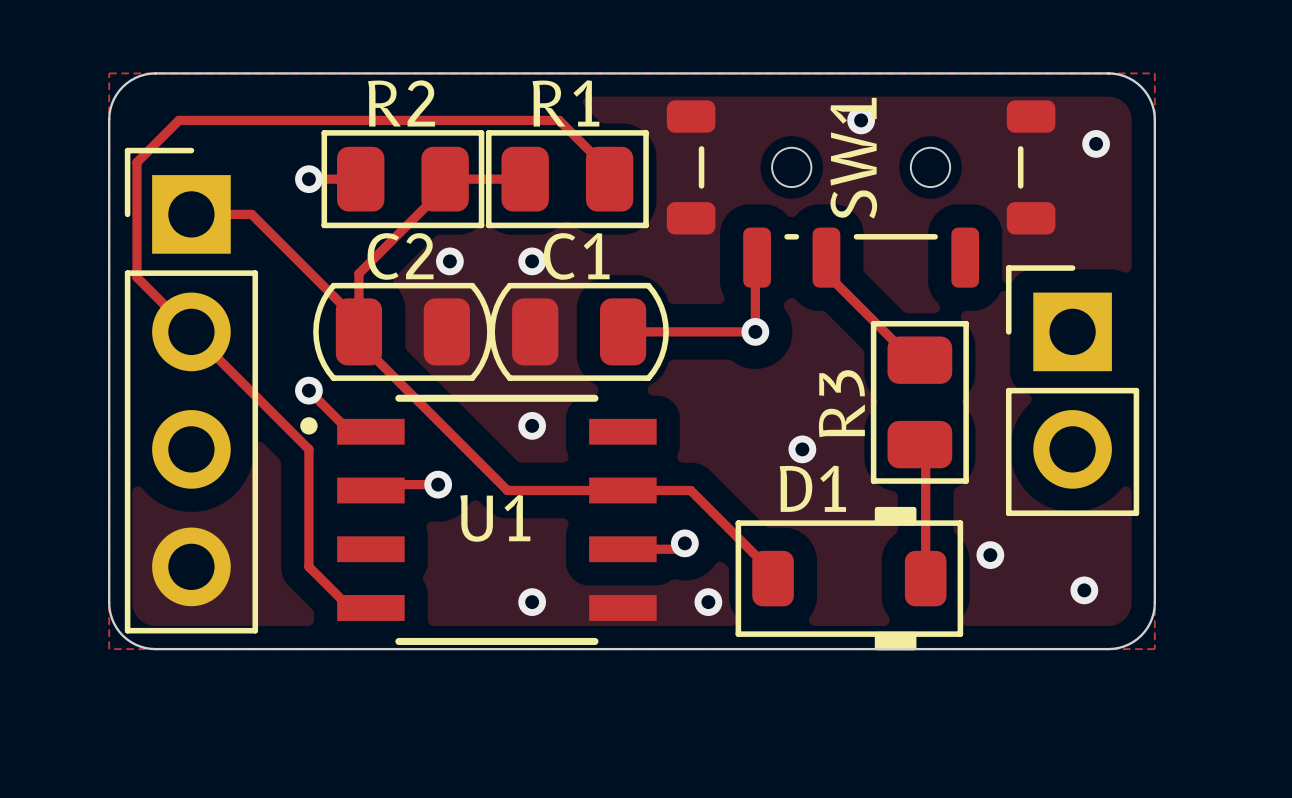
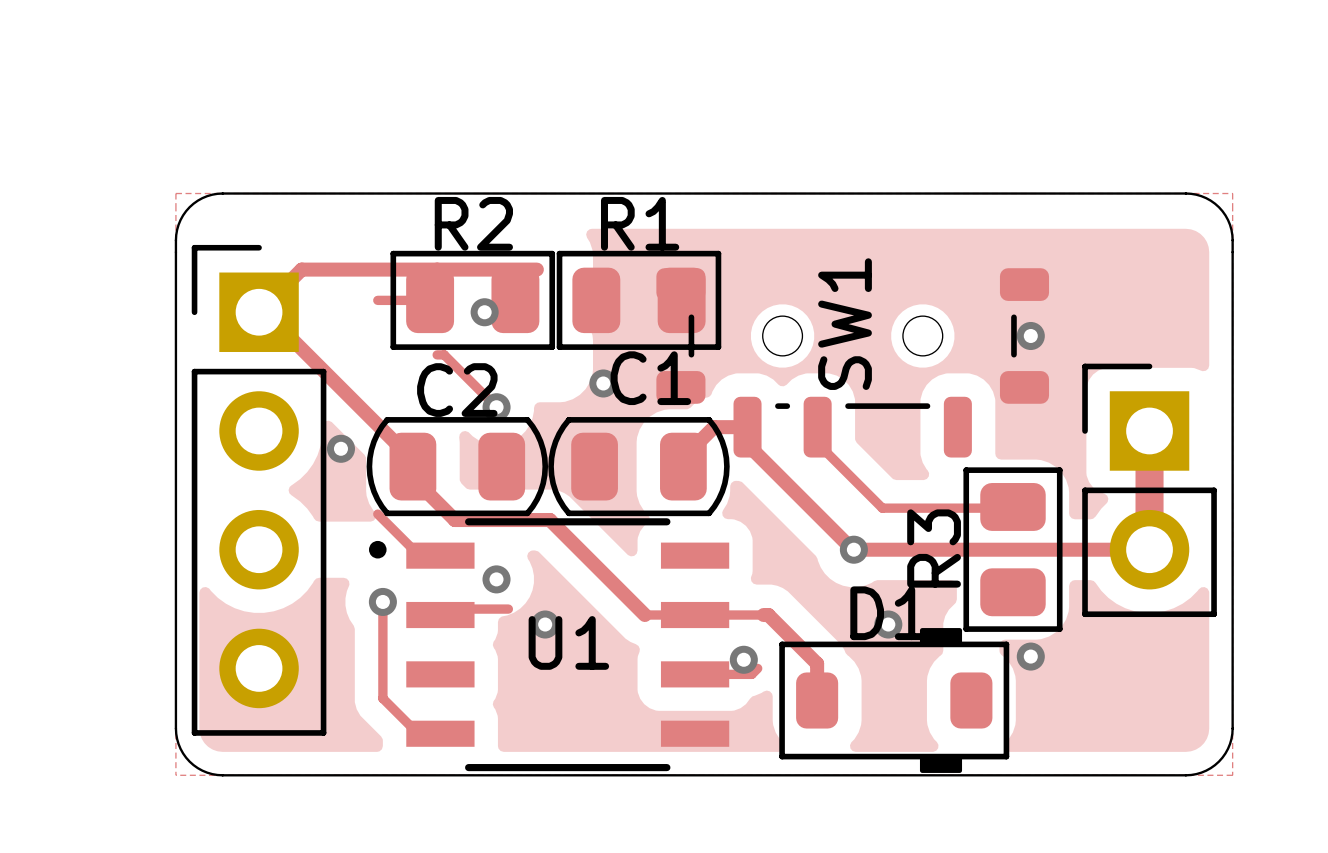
via: (861, 120) -> none
via: (1096, 143) -> none
via: (308, 179) -> none
track: (525, 179) (445, 179) (445, 187) (358, 273) (358, 341) (507, 490) (573, 490) -> (536, 269) (301, 269) (259, 312) (264, 312) (413, 460) (413, 478) (454, 520) (549, 520) (644, 615)
track: (609, 179) (609, 170) (559, 120) (178, 120) (136, 162) (136, 277) (308, 449) (308, 566) (350, 607) -> (382, 601) (382, 698) (419, 733)
via: none -> (484, 312)
SW1 position: (861, 194) -> (852, 362)
track: (191, 214) (251, 214) (358, 321) -> none
via: none -> (1030, 335)
track: none -> (437, 354) (444, 354) (496, 407)
track: (757, 257) (755, 259) (755, 331) (623, 331) -> none
track: (826, 257) (826, 273) (912, 360) (919, 360) -> none
via position: (449, 261) -> (496, 407)
track: none -> (817, 427) (817, 443) (882, 508) (1012, 508)
track: none -> (1149, 430) (1149, 549) (852, 549) (747, 444) (747, 427) (714, 427) (683, 457) (683, 466)
via: none -> (340, 448)
C2 position: (402, 331) -> (457, 466)
C1 position: (579, 331) -> (638, 466)
via: (755, 331) -> none
part position: (191, 390) -> (259, 490)
via: (308, 390) -> none
part position: (1072, 390) -> (1149, 490)
R3 position: (919, 402) -> (1012, 549)
via: (532, 425) -> none
track: (919, 444) (925, 450) (925, 578) -> none
via position: (802, 449) -> (853, 549)
via: none -> (496, 579)
via: none -> (382, 601)
via: (438, 484) -> none
track: (690, 490) (773, 572) (773, 578) -> (763, 615) (768, 615) (817, 663) (817, 700)
via: none -> (545, 624)
via: none -> (888, 624)
via position: (684, 543) -> (743, 659)
via position: (990, 555) -> (1030, 656)
D1 position: (849, 578) -> (894, 700)
via: (1084, 590) -> none
via: (532, 602) -> none
via: (708, 602) -> none

